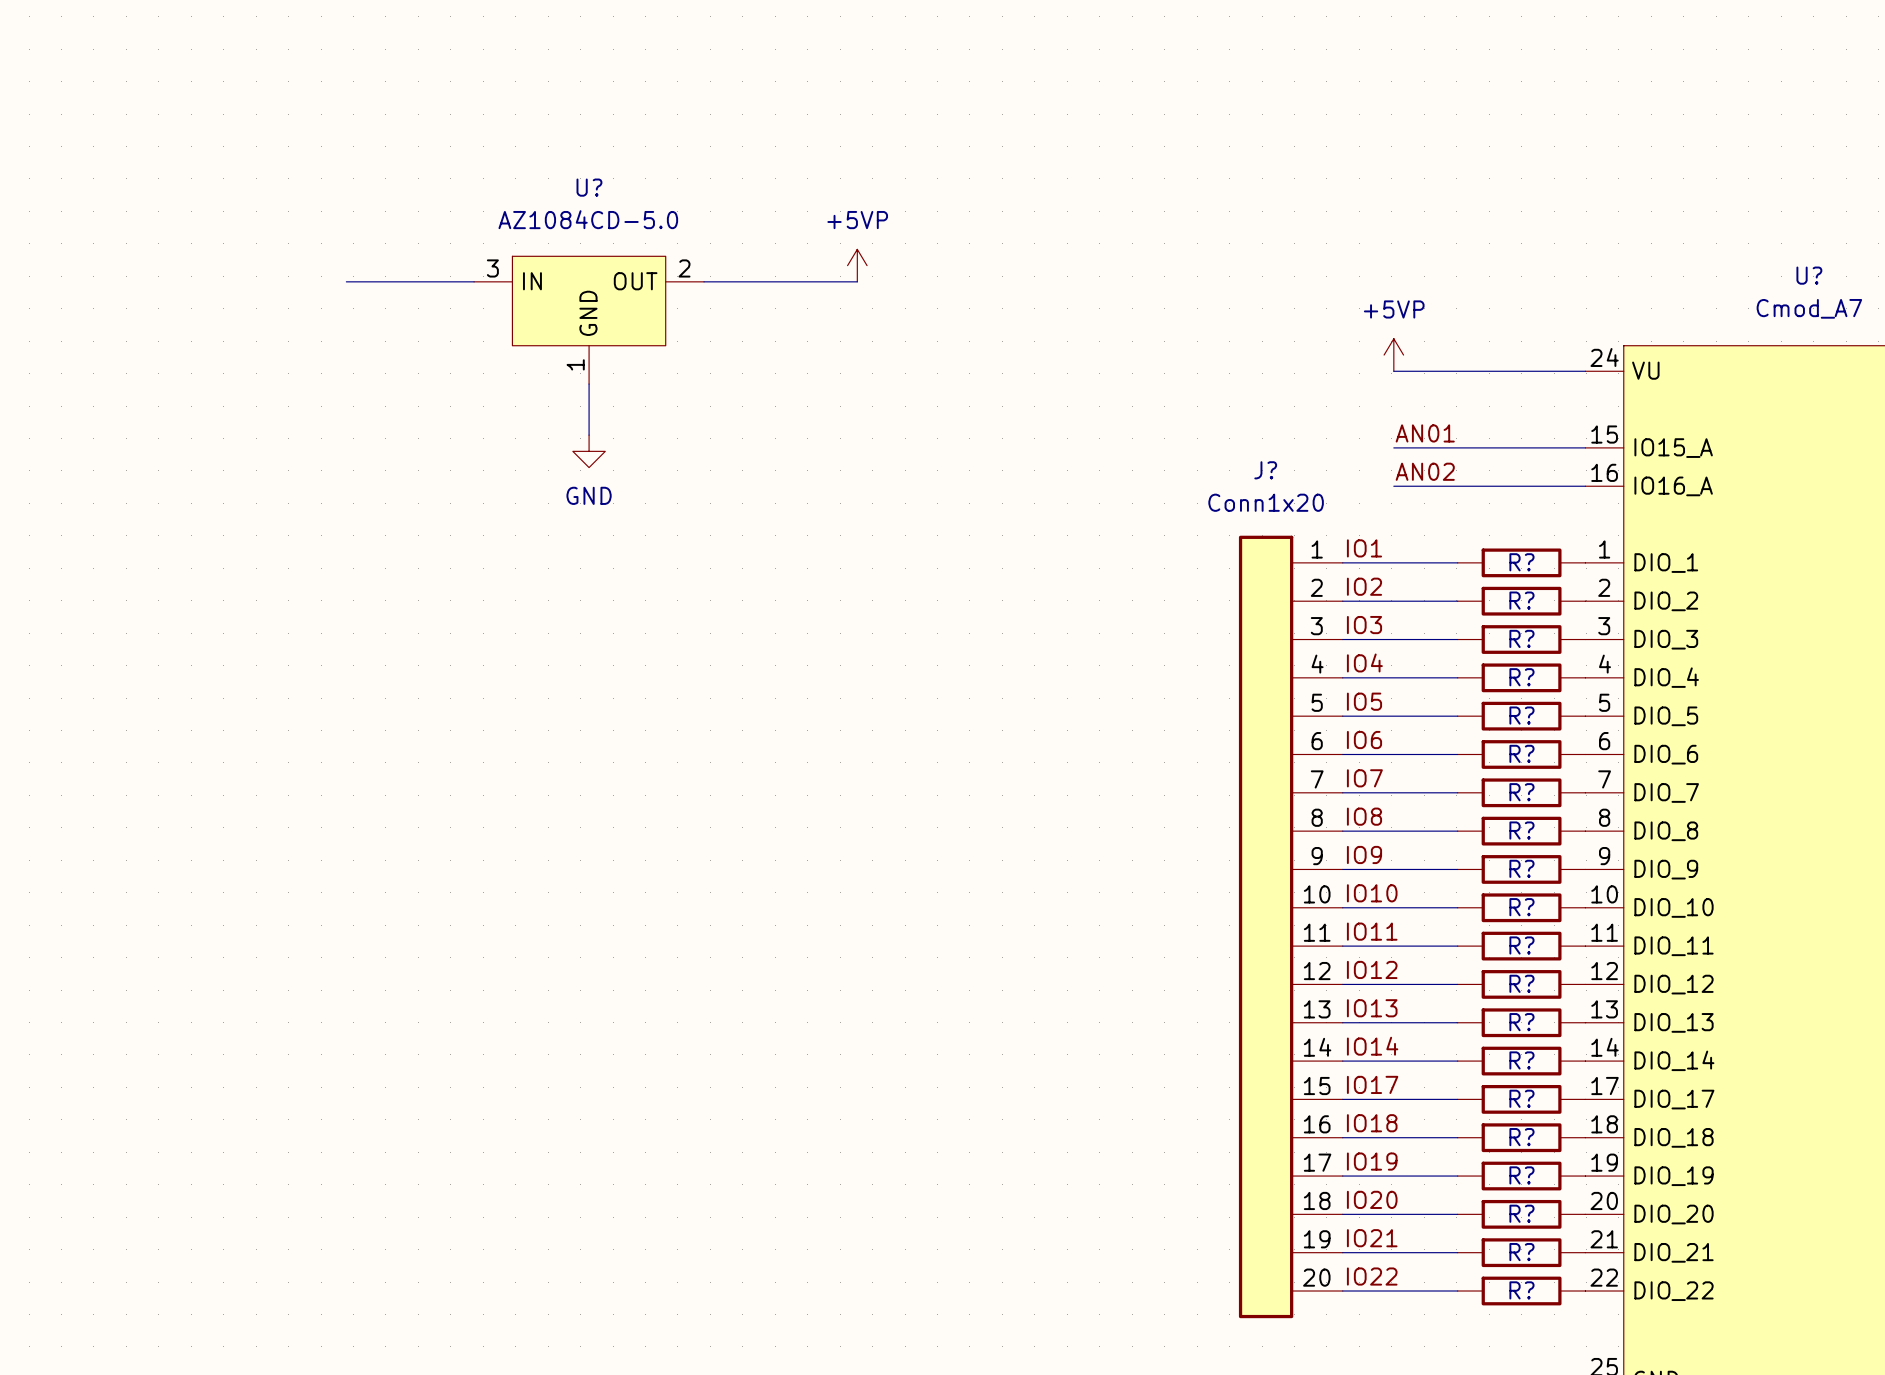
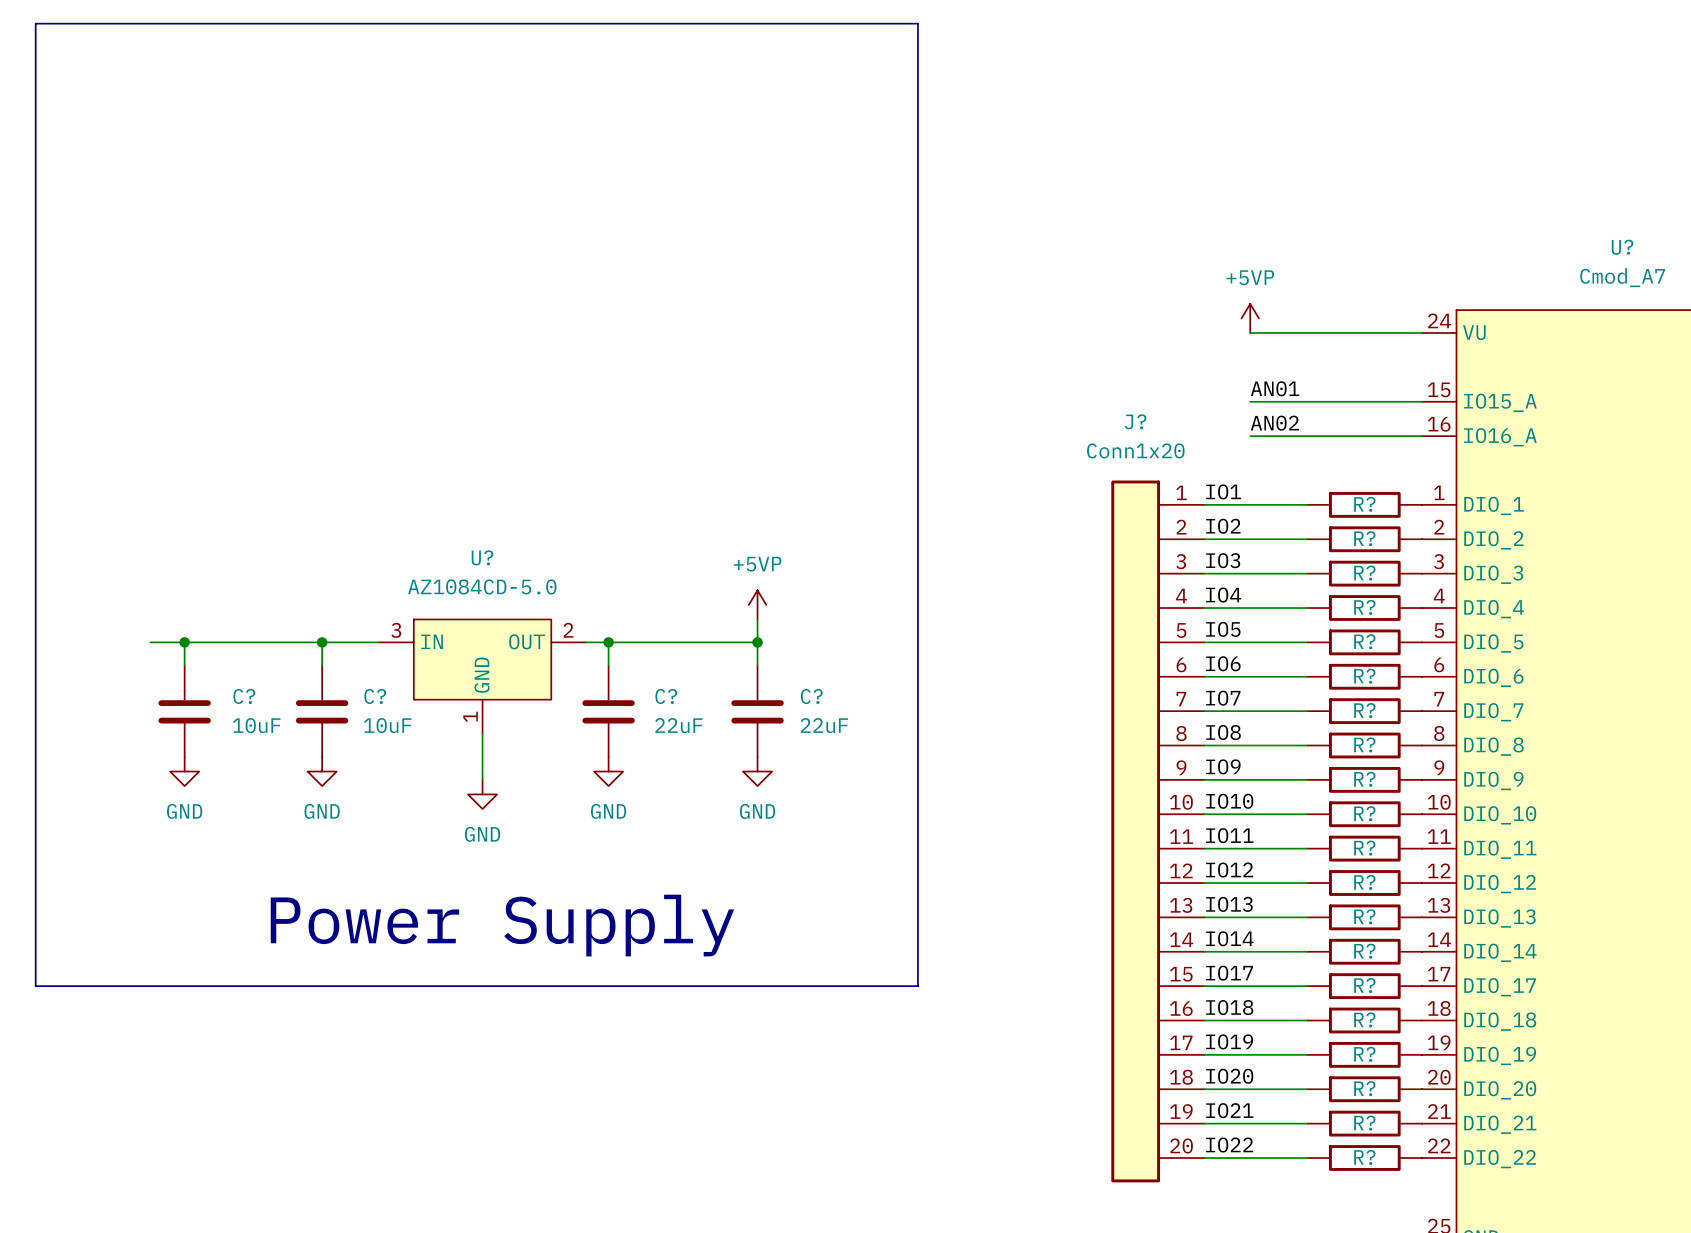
line: none -> (35, 23) (917, 23) (917, 986) (35, 986) (35, 23)
power symbol: +5VP (857, 265) -> none
wire: (346, 281) (474, 281) -> none
wire: (704, 281) (857, 281) -> none
U?: AZ1084CD-5.0 (589, 320) -> none
wire: (589, 384) (589, 435) -> none
power symbol: GND (589, 451) -> none
power symbol: none -> +5VP (757, 604)
wire: none -> (757, 619) (757, 665)
wire: none -> (150, 642) (379, 642)
wire: none -> (184, 642) (184, 665)
junction: none -> (184, 642)
wire: none -> (322, 642) (322, 665)
junction: none -> (322, 642)
wire: none -> (585, 642) (757, 642)
wire: none -> (608, 642) (608, 665)
junction: none -> (608, 642)
junction: none -> (757, 642)
U?: none -> AZ1084CD-5.0 (482, 676)
C?: none -> 10uF (184, 711)
C?: none -> 10uF (322, 711)
C?: none -> 22uF (608, 711)
C?: none -> 22uF (757, 711)
wire: none -> (482, 734) (482, 779)
power symbol: none -> GND (184, 771)
power symbol: none -> GND (322, 771)
power symbol: none -> GND (608, 771)
power symbol: none -> GND (757, 771)
power symbol: none -> GND (482, 794)
text: none -> Power Supply (502, 925)

